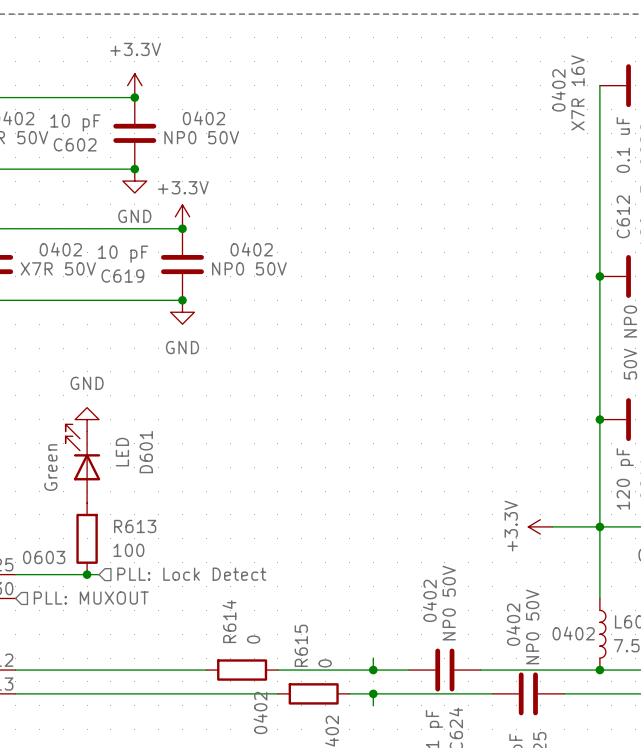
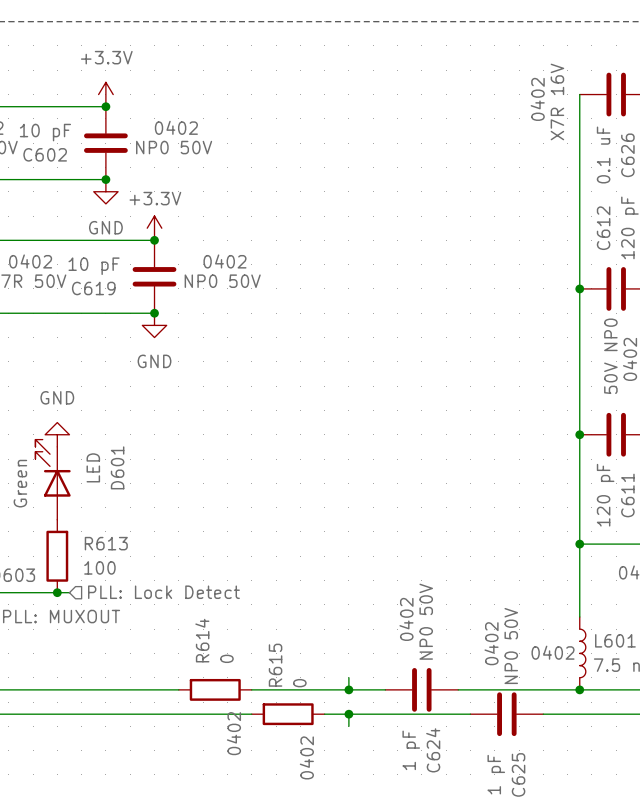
power symbol: +3.3V (540, 526) -> none
wire: (552, 526) (599, 526) -> none

